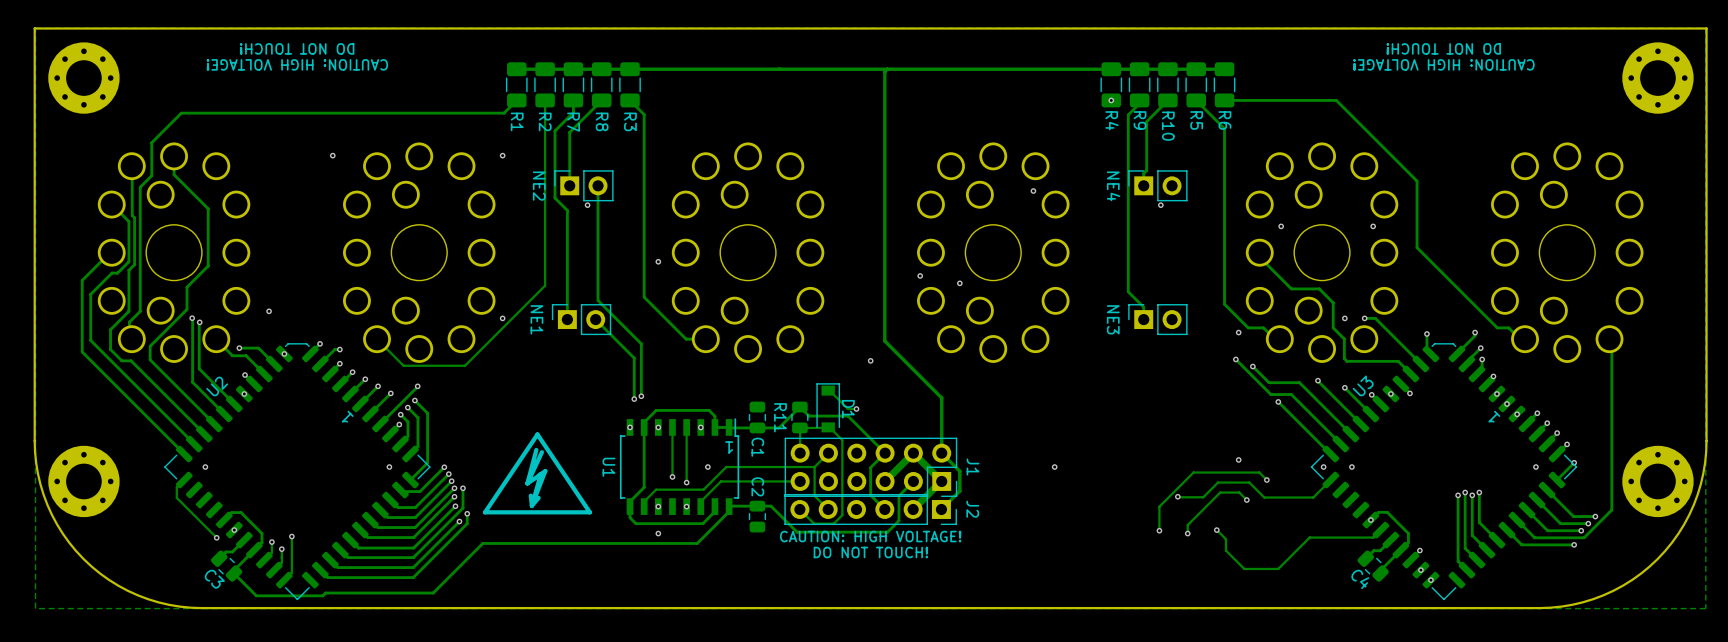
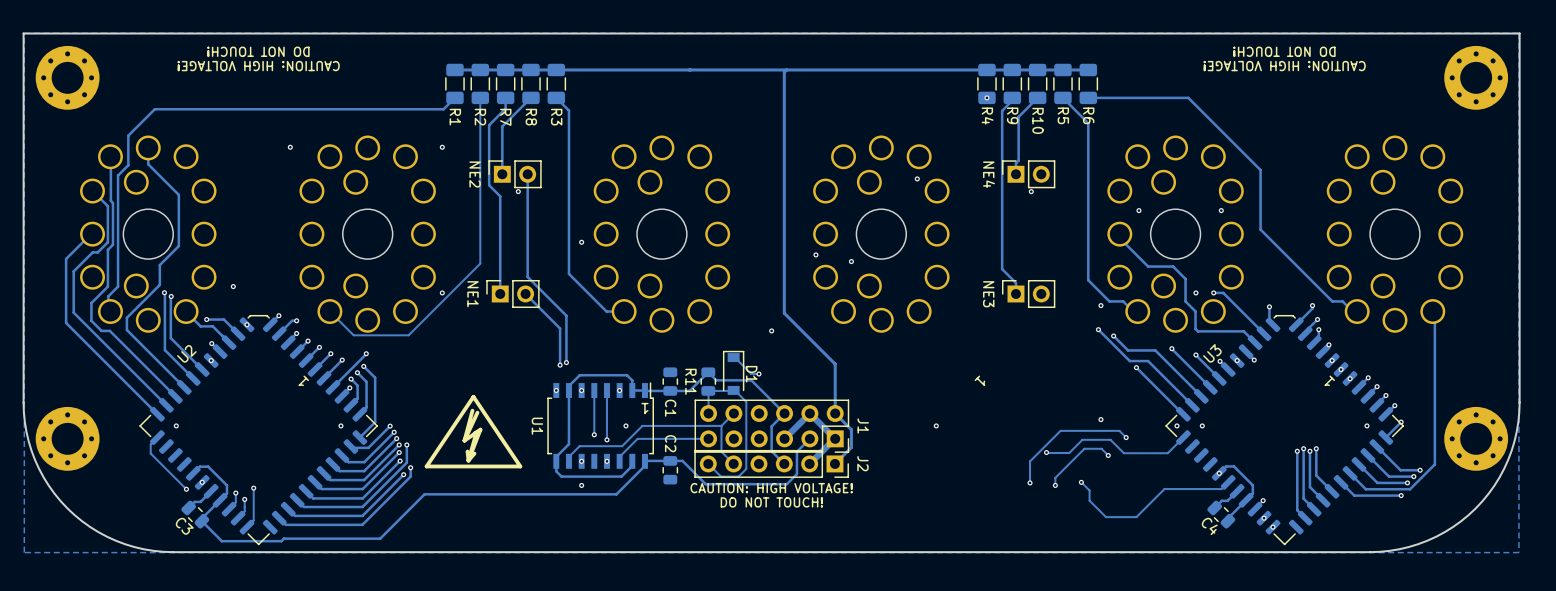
text: none -> 1 (979, 380)

